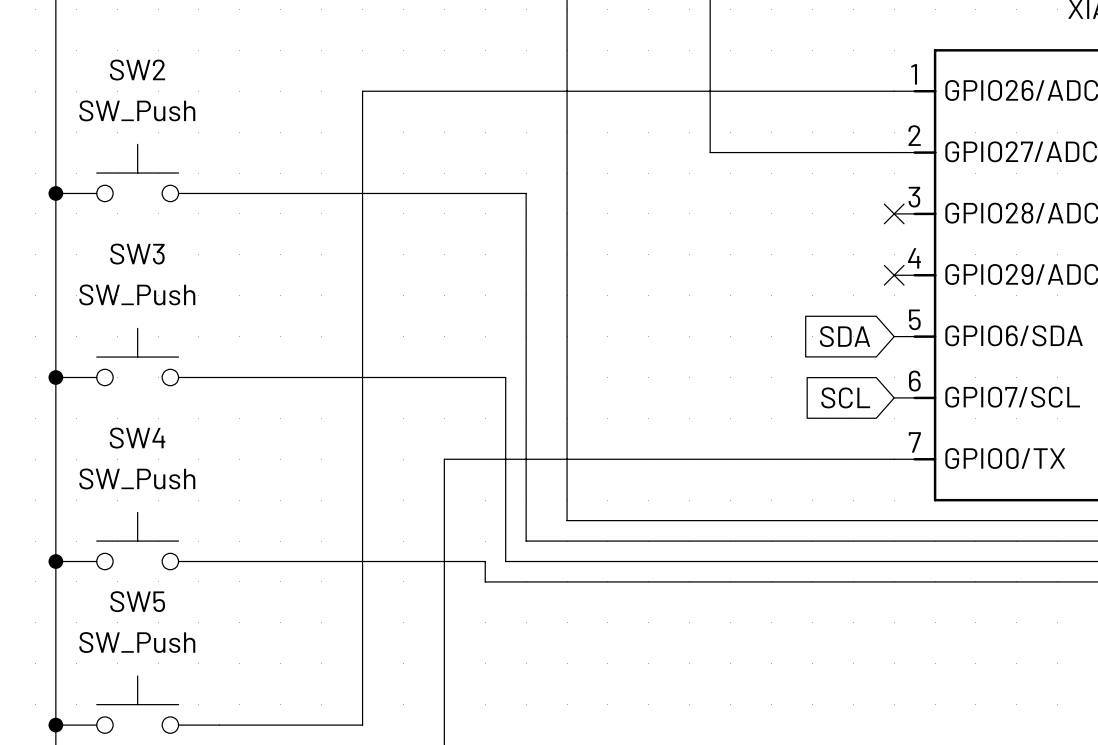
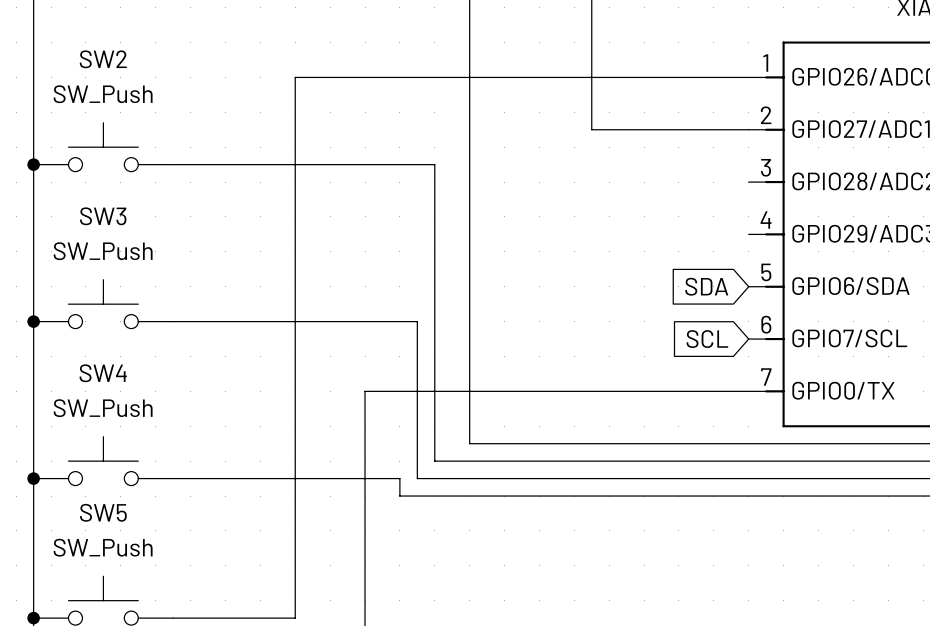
no-connect mark: (894, 213) -> none
no-connect mark: (894, 275) -> none

